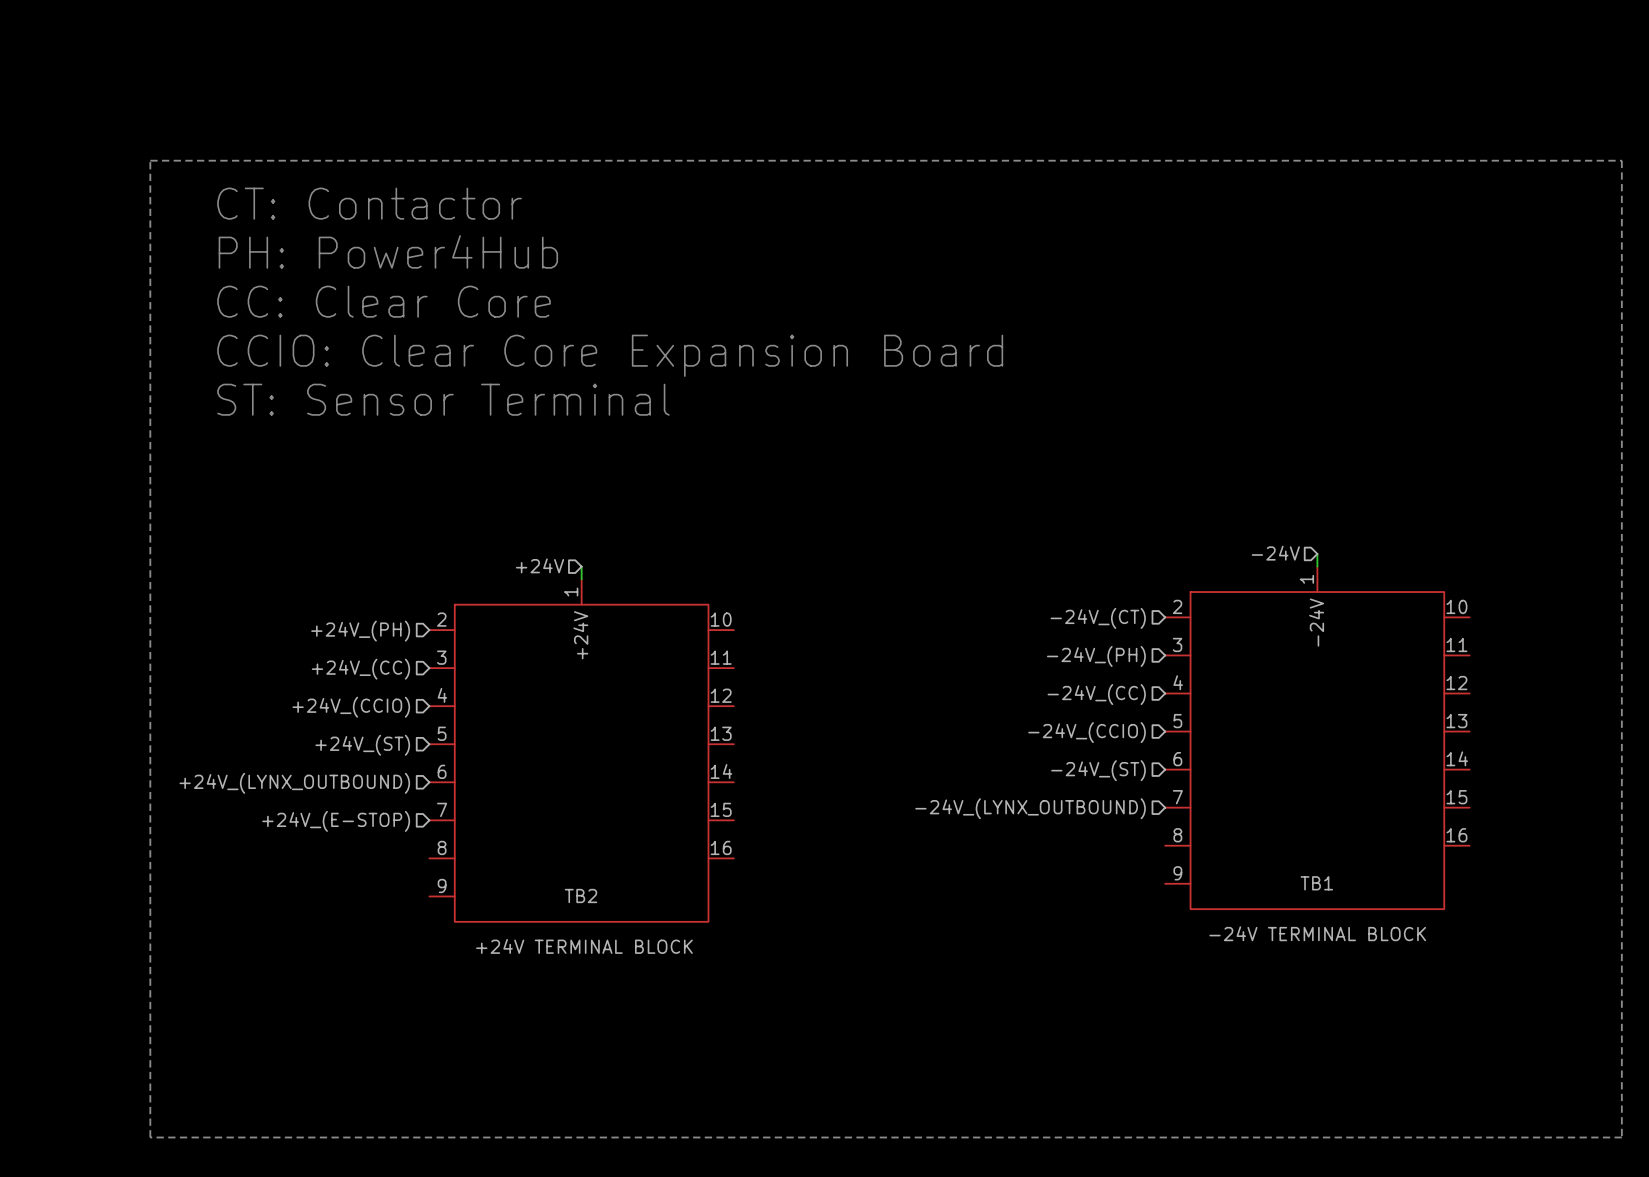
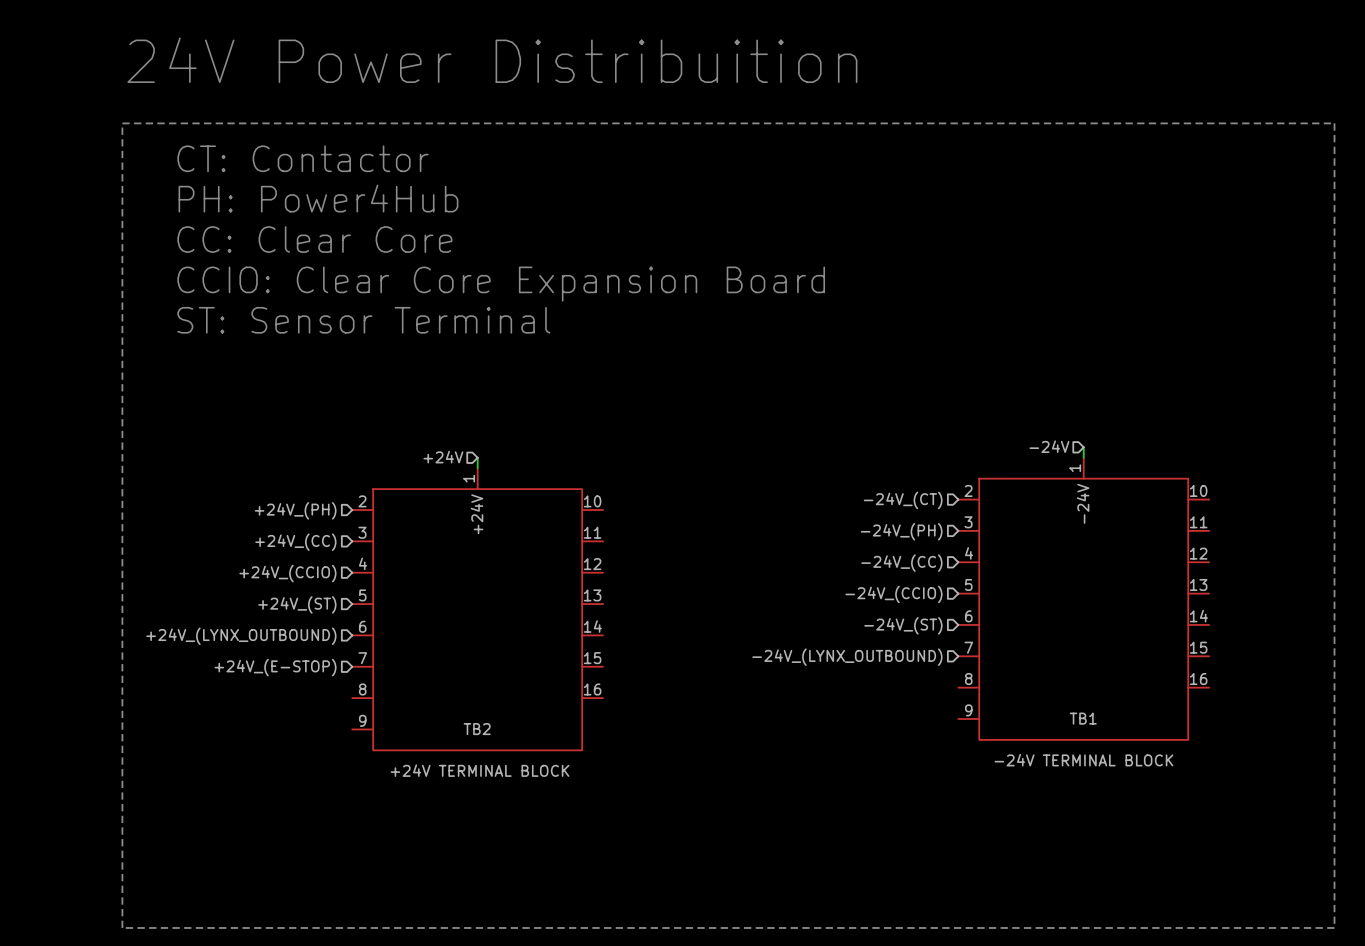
text: none -> 24V Power Distribuition (492, 60)

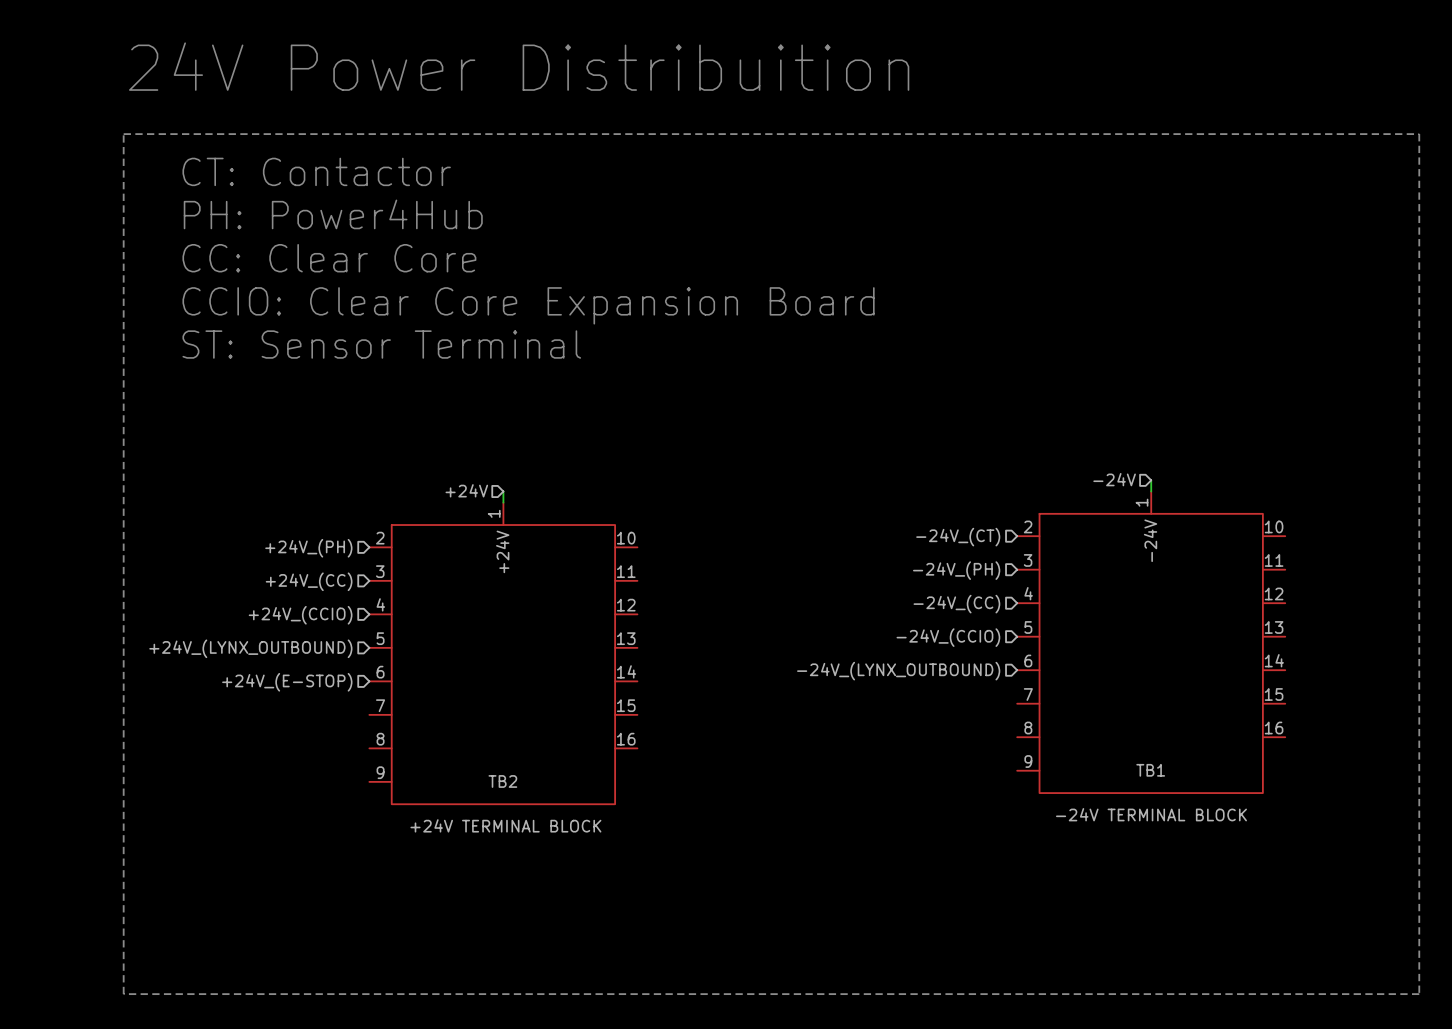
hierarchical label: +24V_(ST) (297, 604) -> +24V_(LYNX_OUTBOUND) (250, 648)
hierarchical label: -24V_(ST) (903, 625) -> -24V_(LYNX_OUTBOUND) (898, 671)
hierarchical label: +24V_(LYNX_OUTBOUND) (241, 636) -> +24V_(E-STOP) (287, 682)
hierarchical label: -24V_(LYNX_OUTBOUND) (847, 657) -> none
hierarchical label: +24V_(E-STOP) (275, 667) -> none

